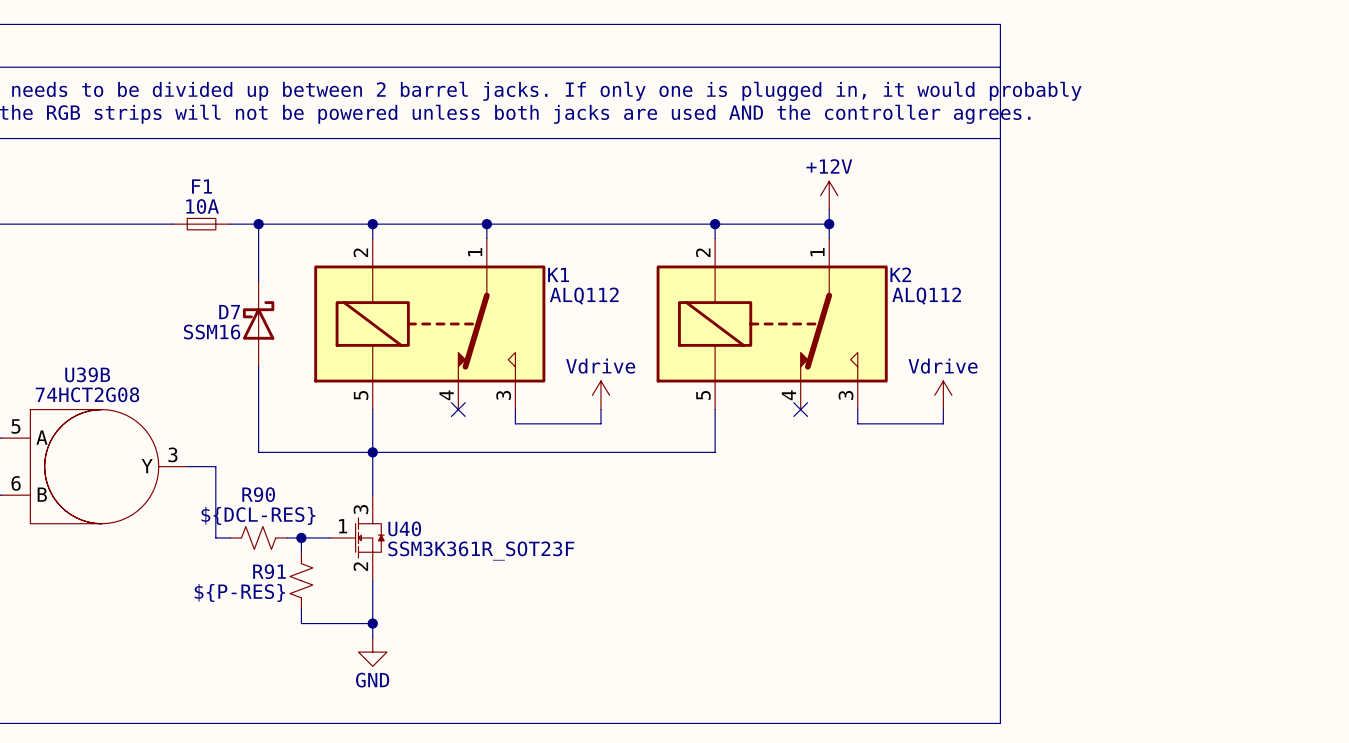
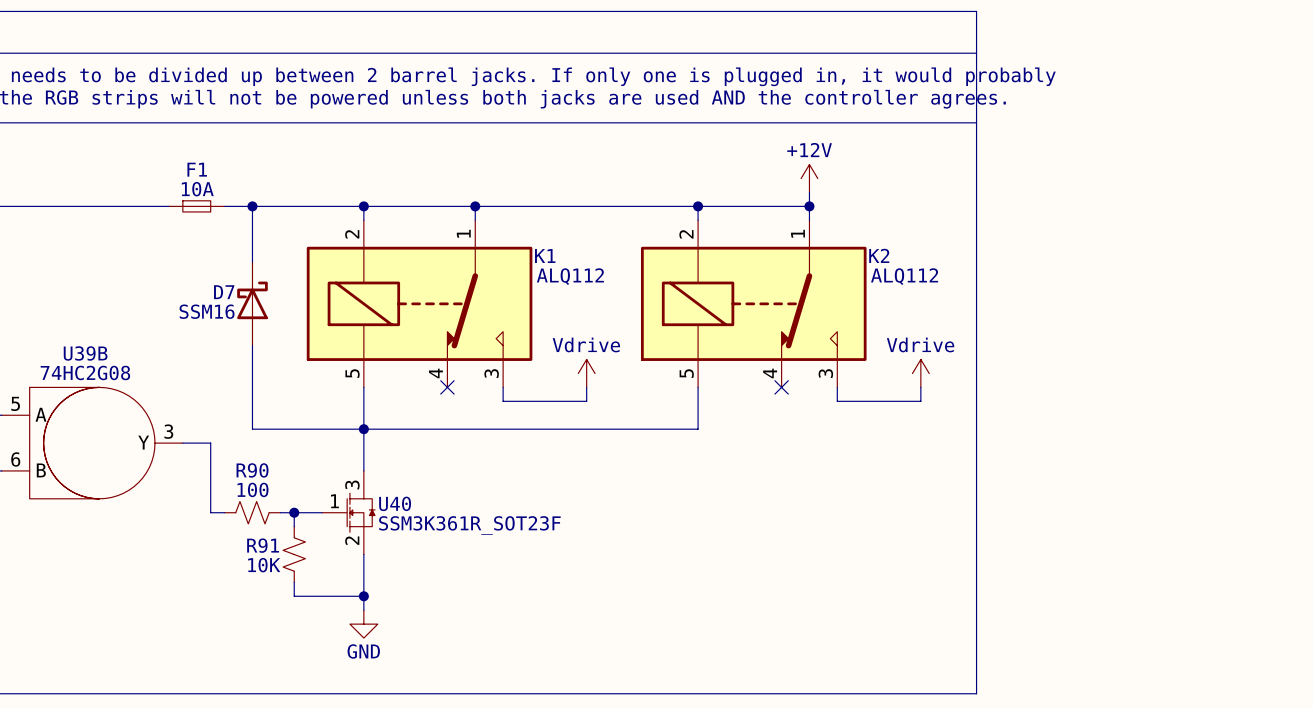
U39B value: 74HCT2G08 (87, 394) -> 74HC2G08 (85, 372)
R90 value: ${DCL-RES} (258, 515) -> 100 (253, 489)
R91 value: ${P-RES} (239, 592) -> 10K (264, 565)

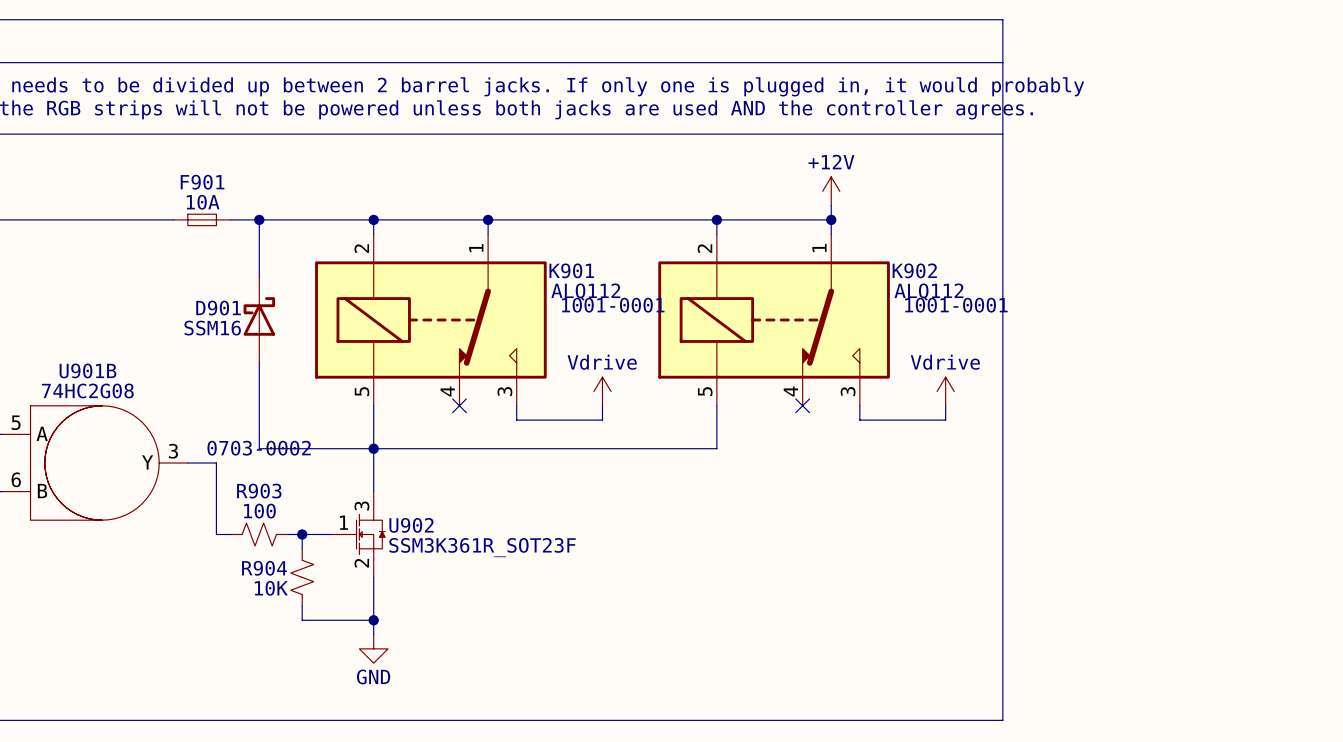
F1 name: F1 (197, 169) -> F901 (202, 182)
K1 name: K1 (545, 255) -> K901 (571, 270)
K2 name: K2 (879, 255) -> K902 (914, 270)
K1 text: none -> 1001-0001 (613, 305)
K2 text: none -> 1001-0001 (956, 305)
D7 name: D7 (224, 292) -> D901 (218, 308)
U39B name: U39B (85, 353) -> U901B (87, 370)
U40 text: none -> 0703-0002 (259, 448)
R90 name: R90 (252, 470) -> R903 (259, 491)
U40 name: U40 (395, 503) -> U902 (411, 525)
R91 name: R91 (263, 545) -> R904 (264, 568)

